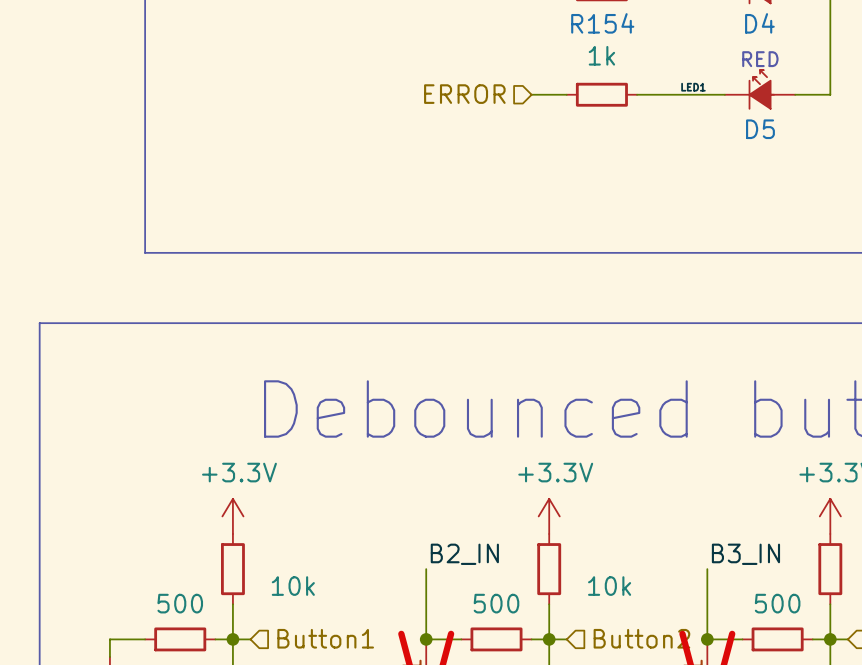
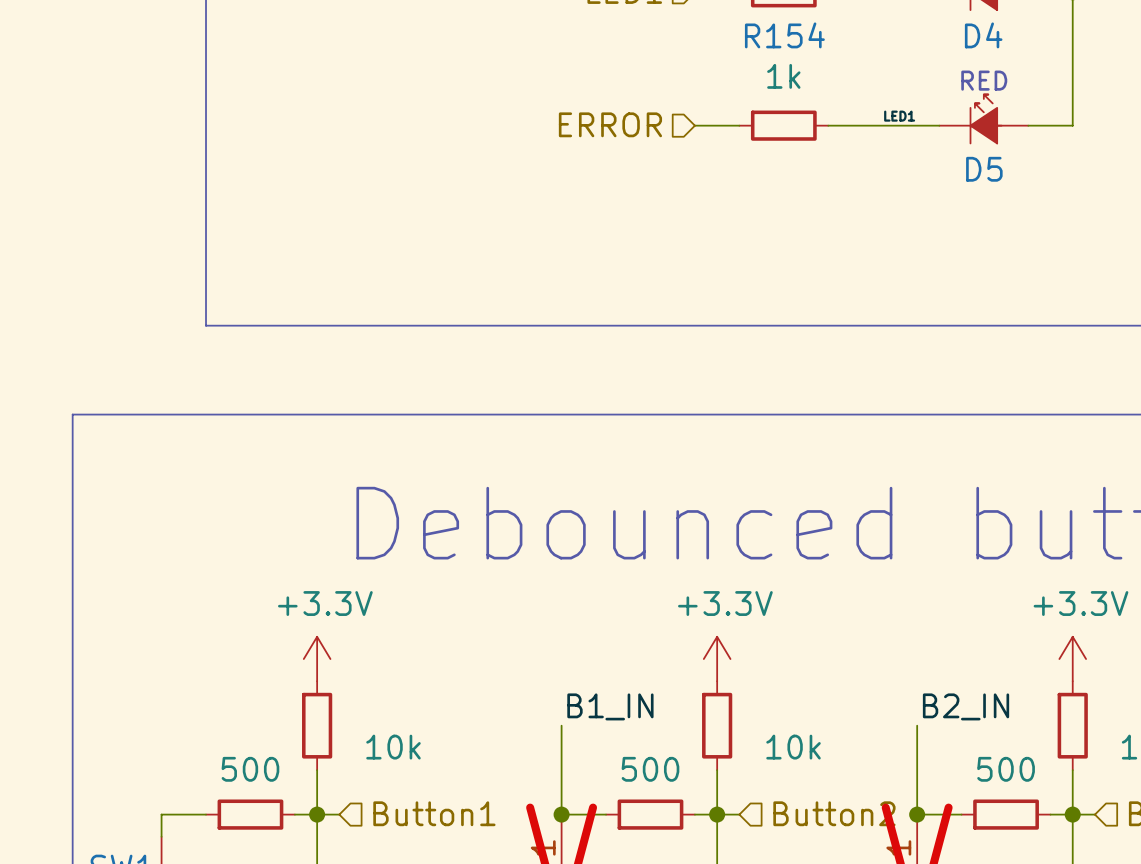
label: B2_IN (464, 554) -> B1_IN (610, 706)
label: B3_IN (745, 554) -> B2_IN (966, 706)

